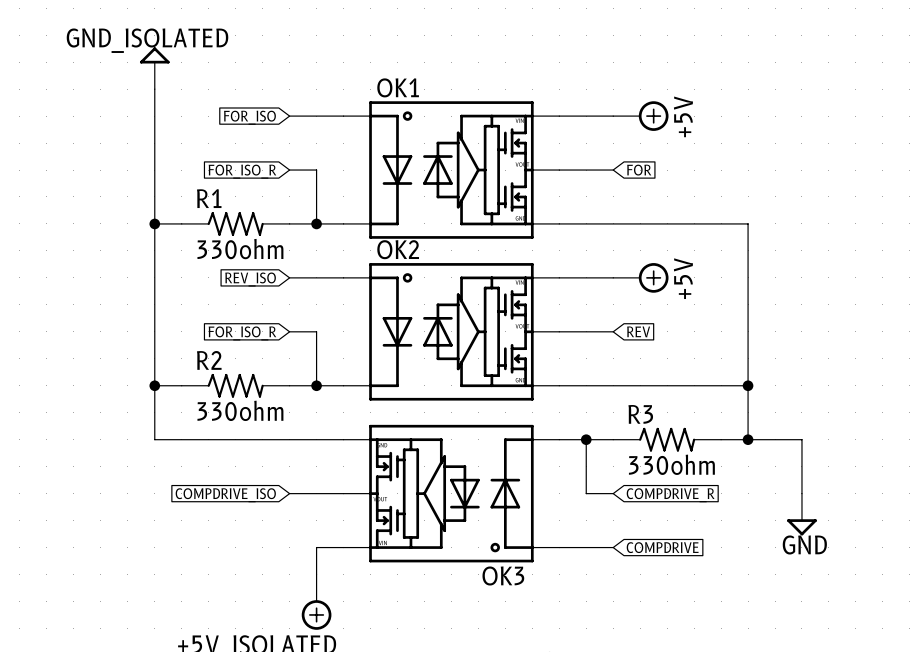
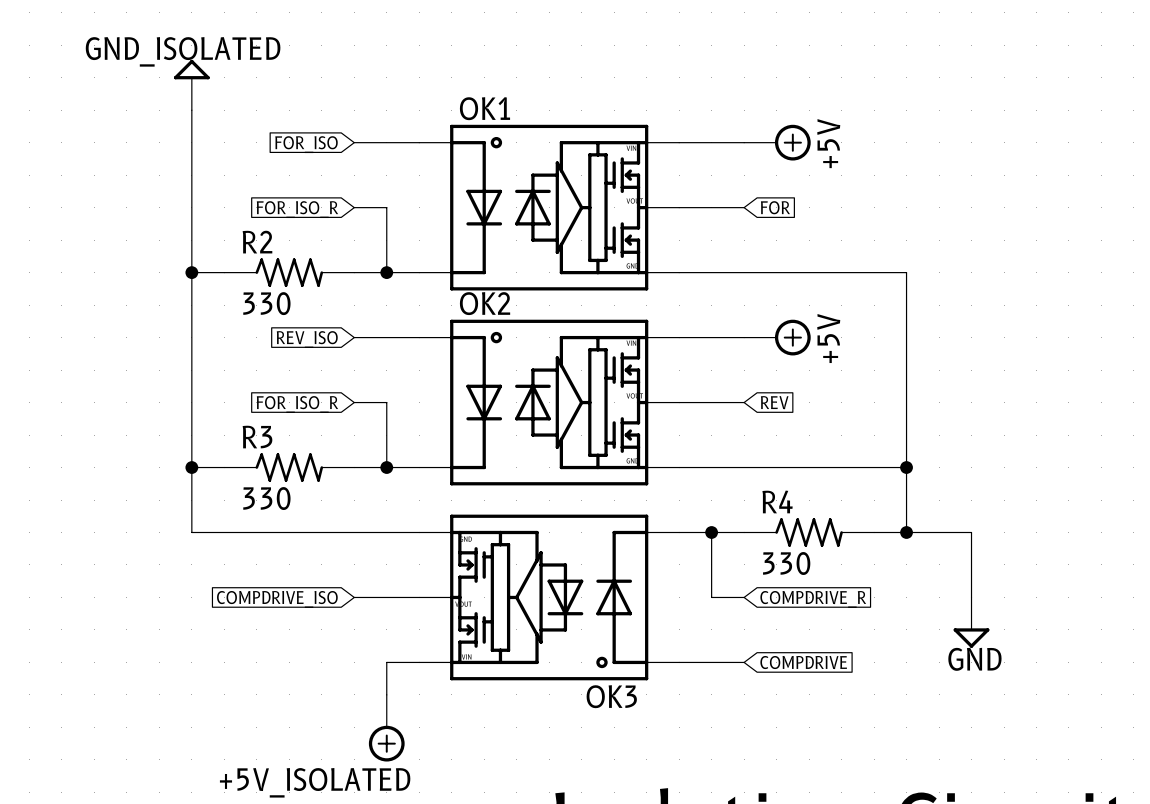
R1 name: R1 (209, 198) -> R2 (257, 242)
R1 value: 330ohm (240, 249) -> 330 (266, 303)
R2 name: R2 (209, 360) -> R3 (257, 437)
R2 value: 330ohm (240, 410) -> 330 (266, 498)
R3 name: R3 (640, 414) -> R4 (777, 501)
R3 value: 330ohm (671, 464) -> 330 (786, 563)

